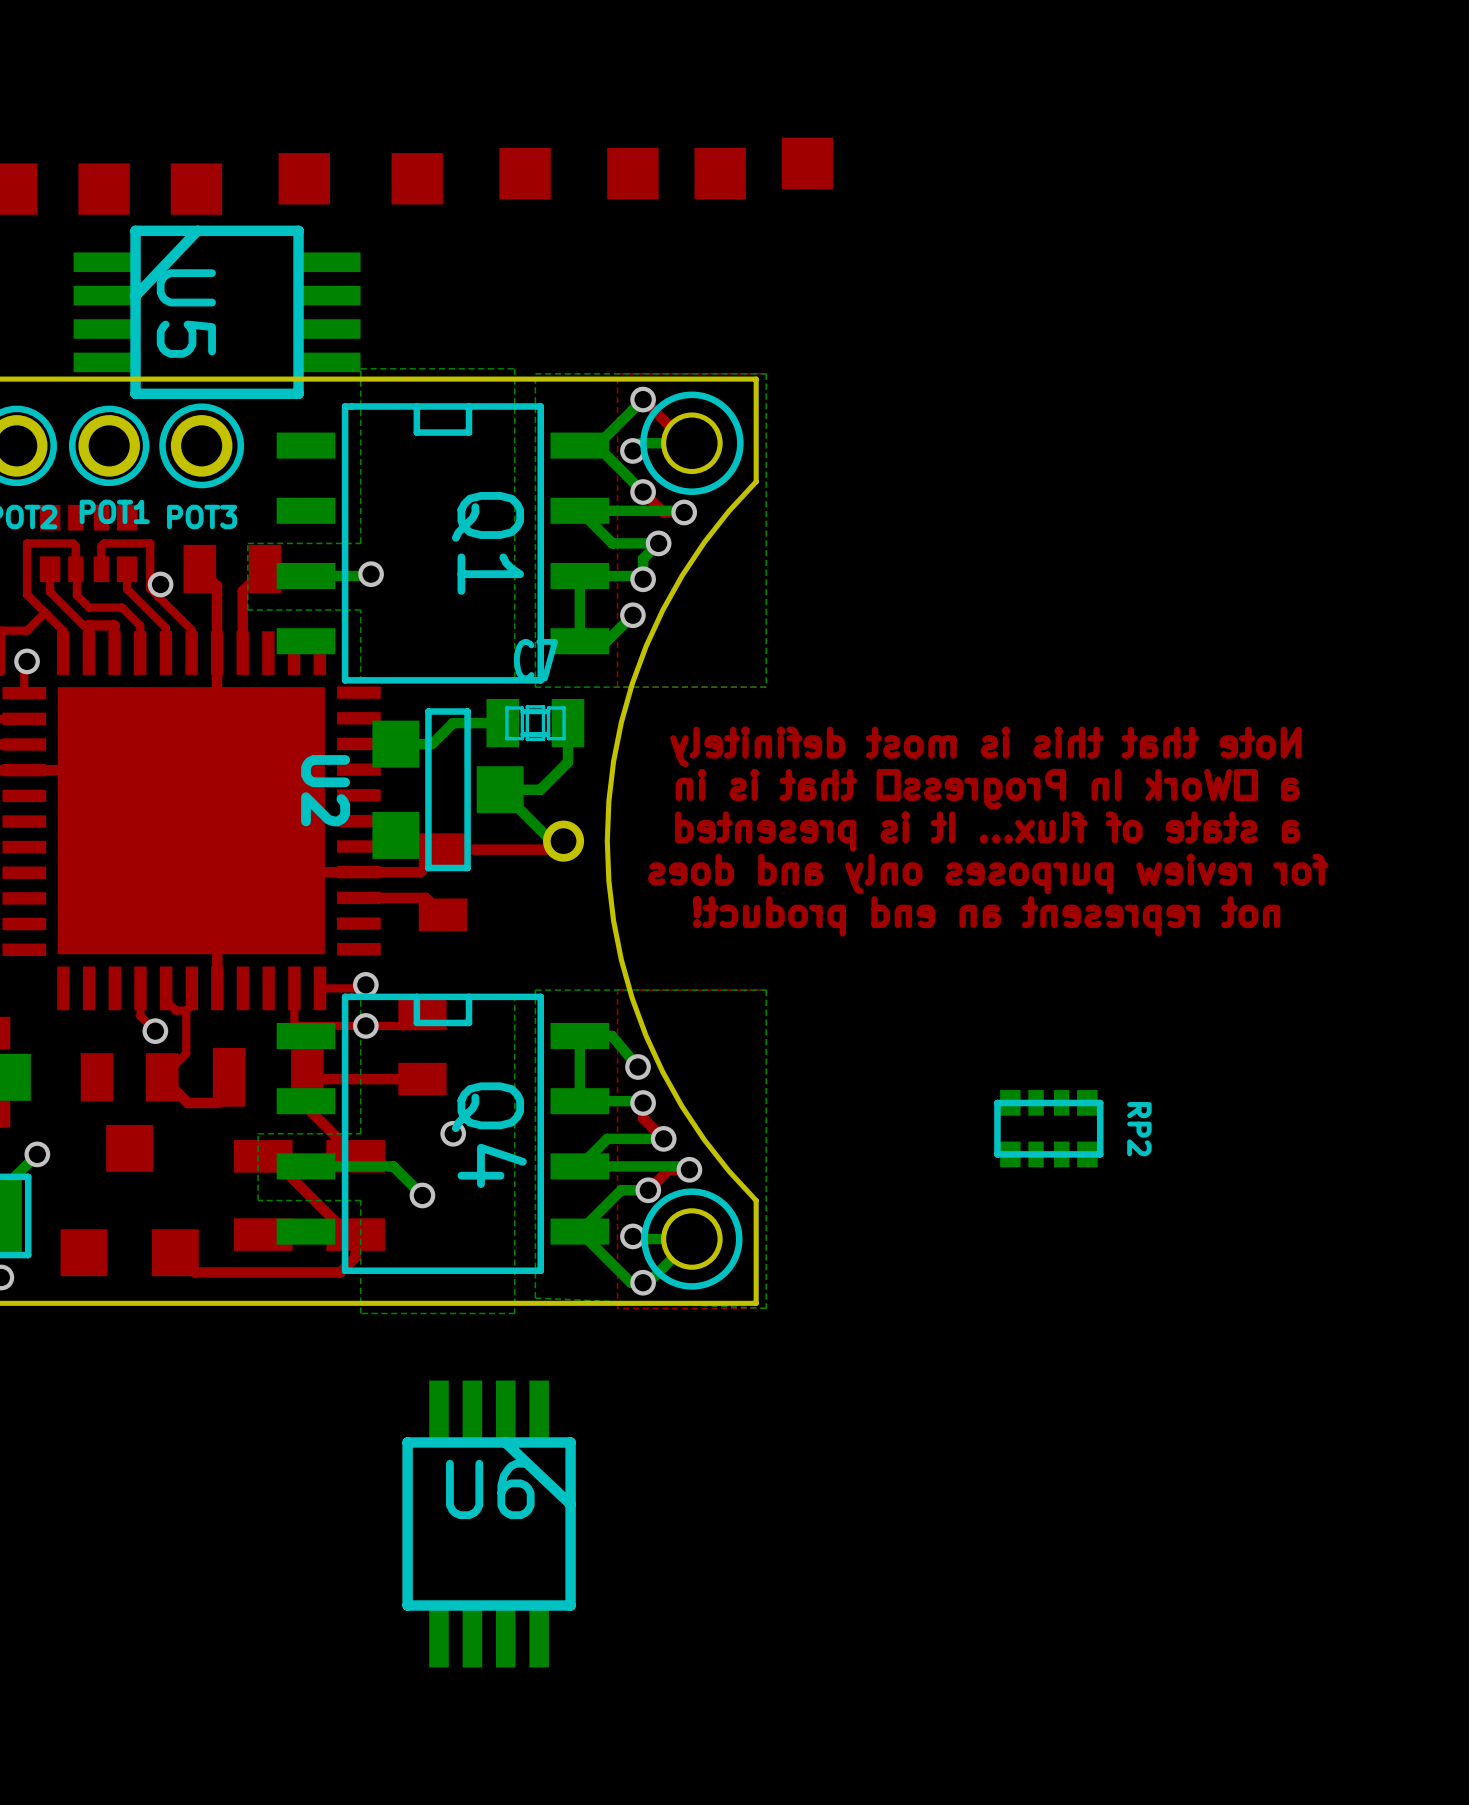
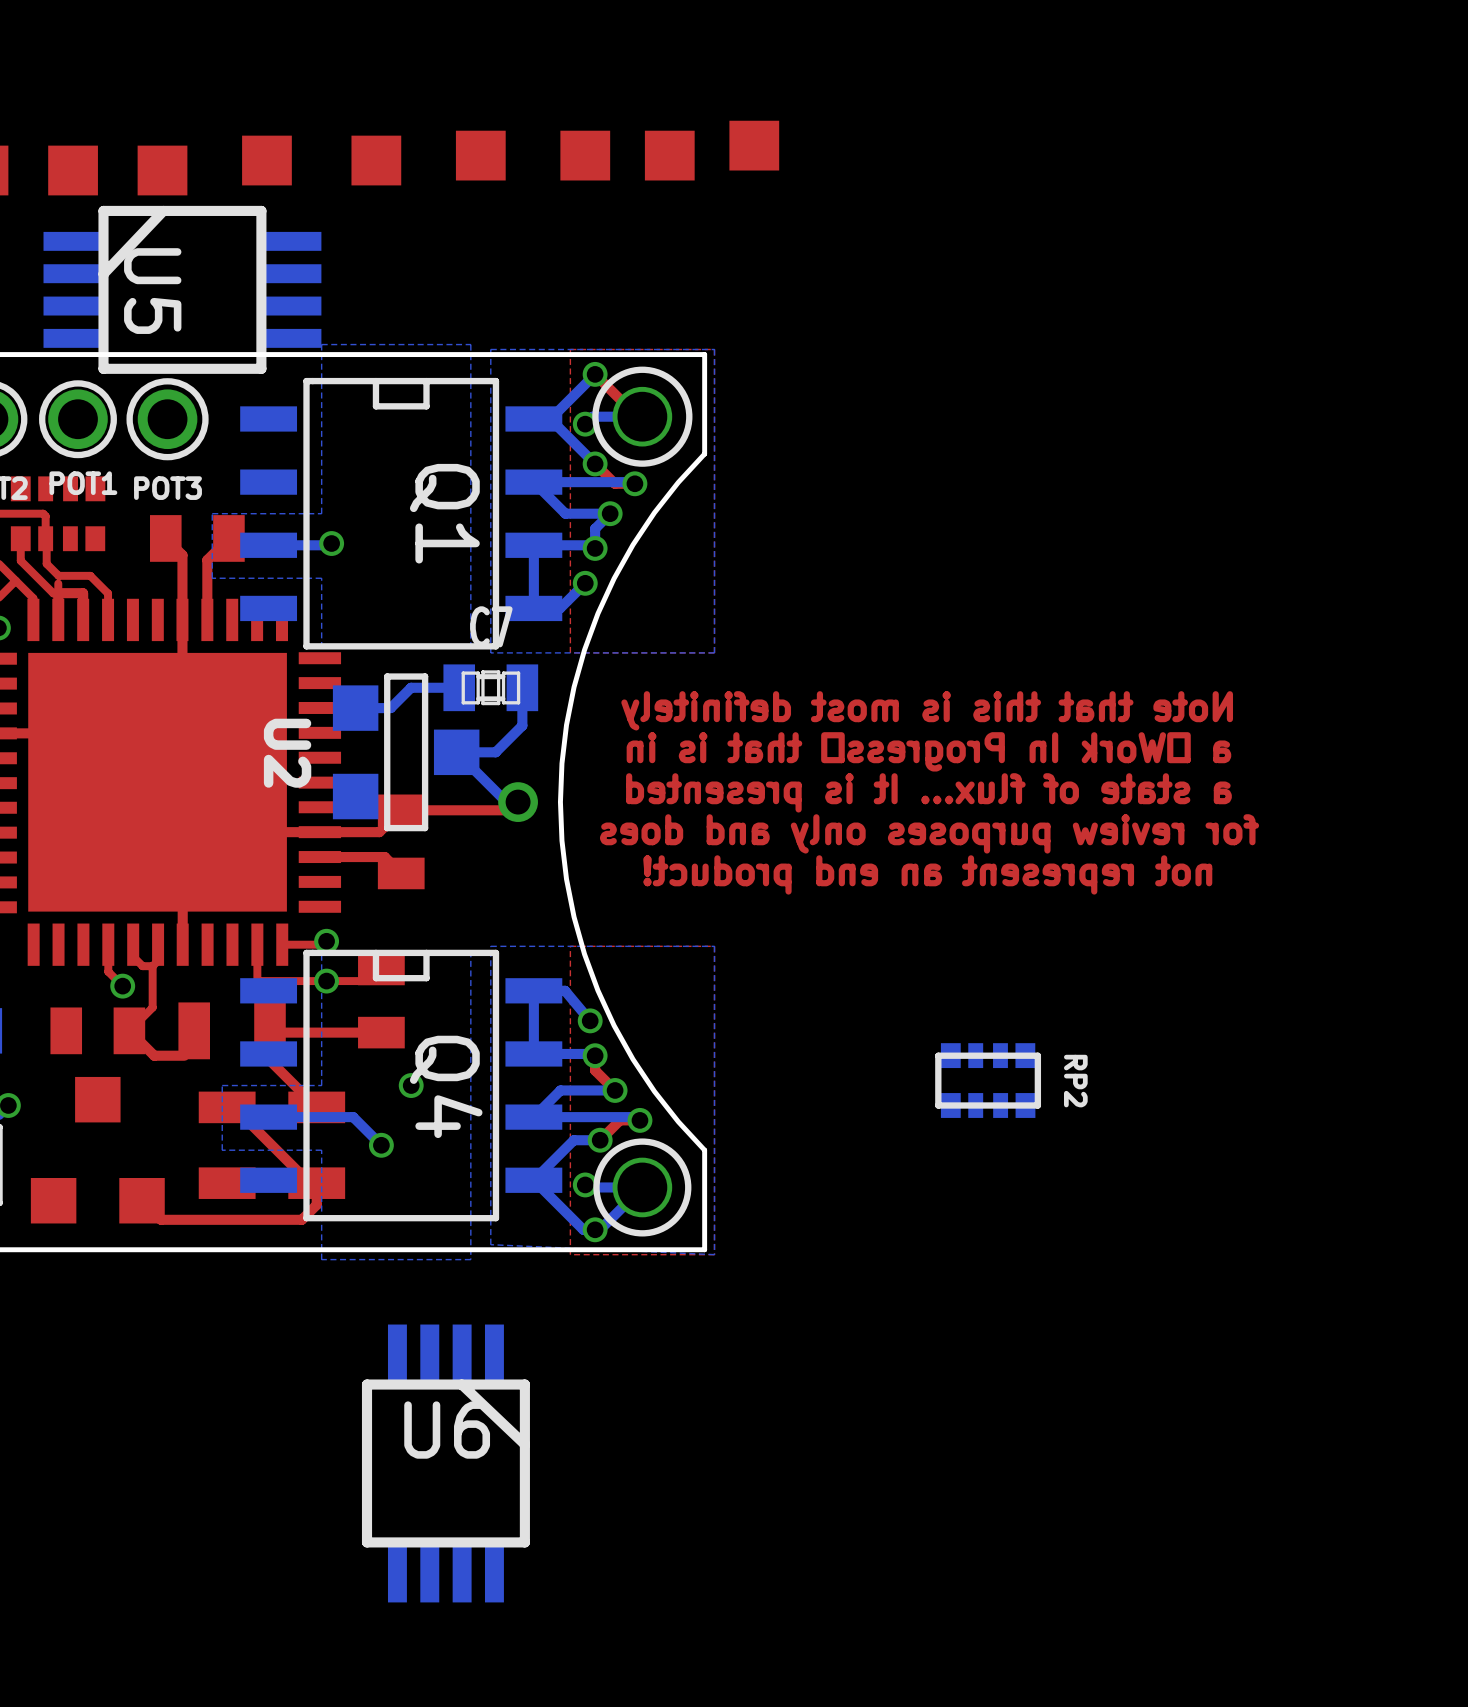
top track: (101, 569) (101, 546) (104, 543) (150, 543) (150, 588) (191, 629) (191, 653) -> none
top track: (127, 569) (127, 589) (165, 627) (165, 653) -> none
via: (160, 584) -> none
top track: none -> (58, 583) (58, 593)

